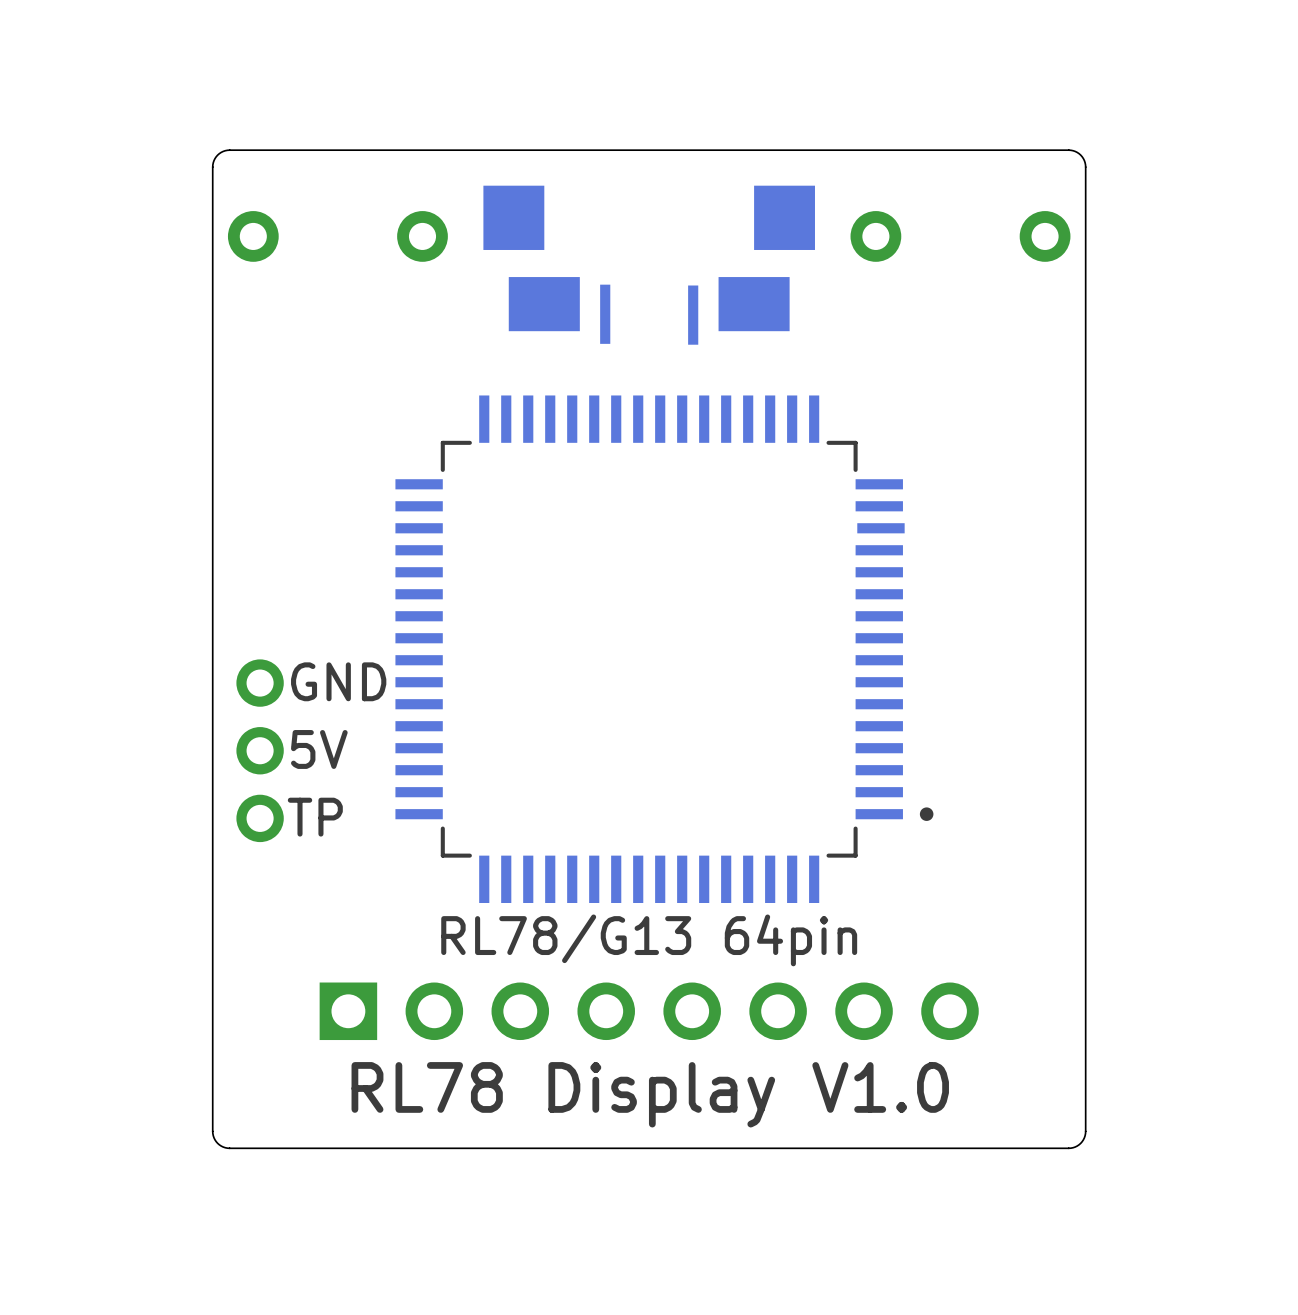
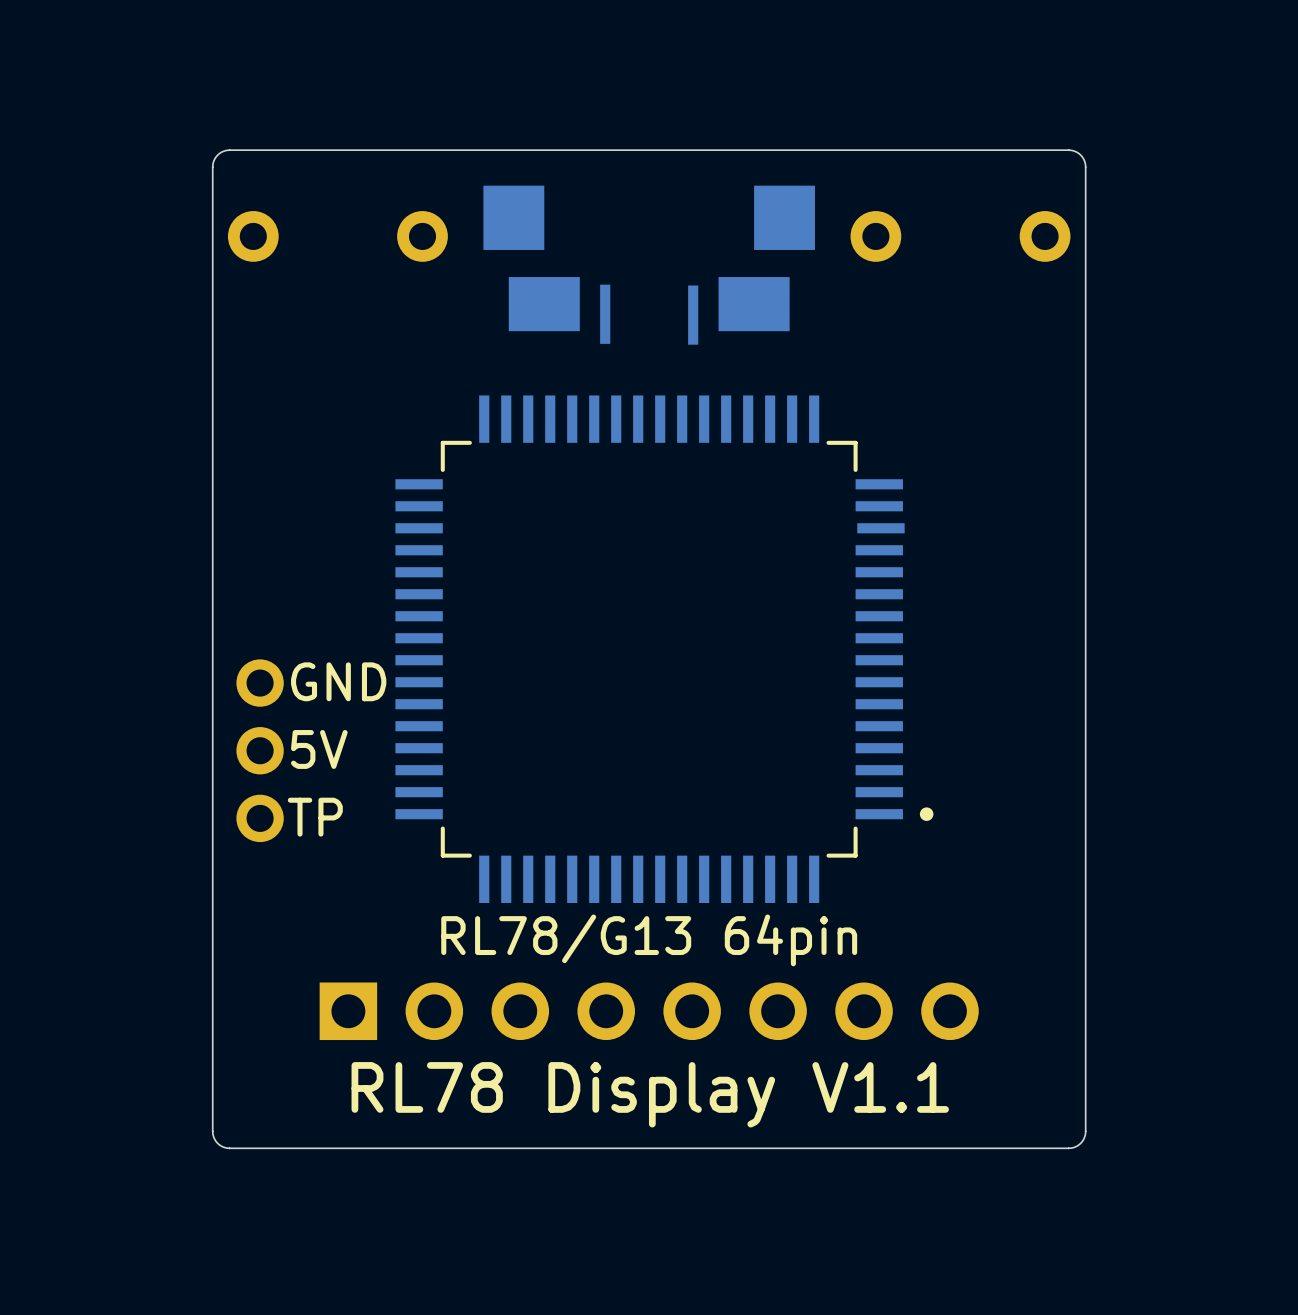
text: RL78 Display V1.0 (650, 1094) -> RL78 Display V1.1 (650, 1094)

